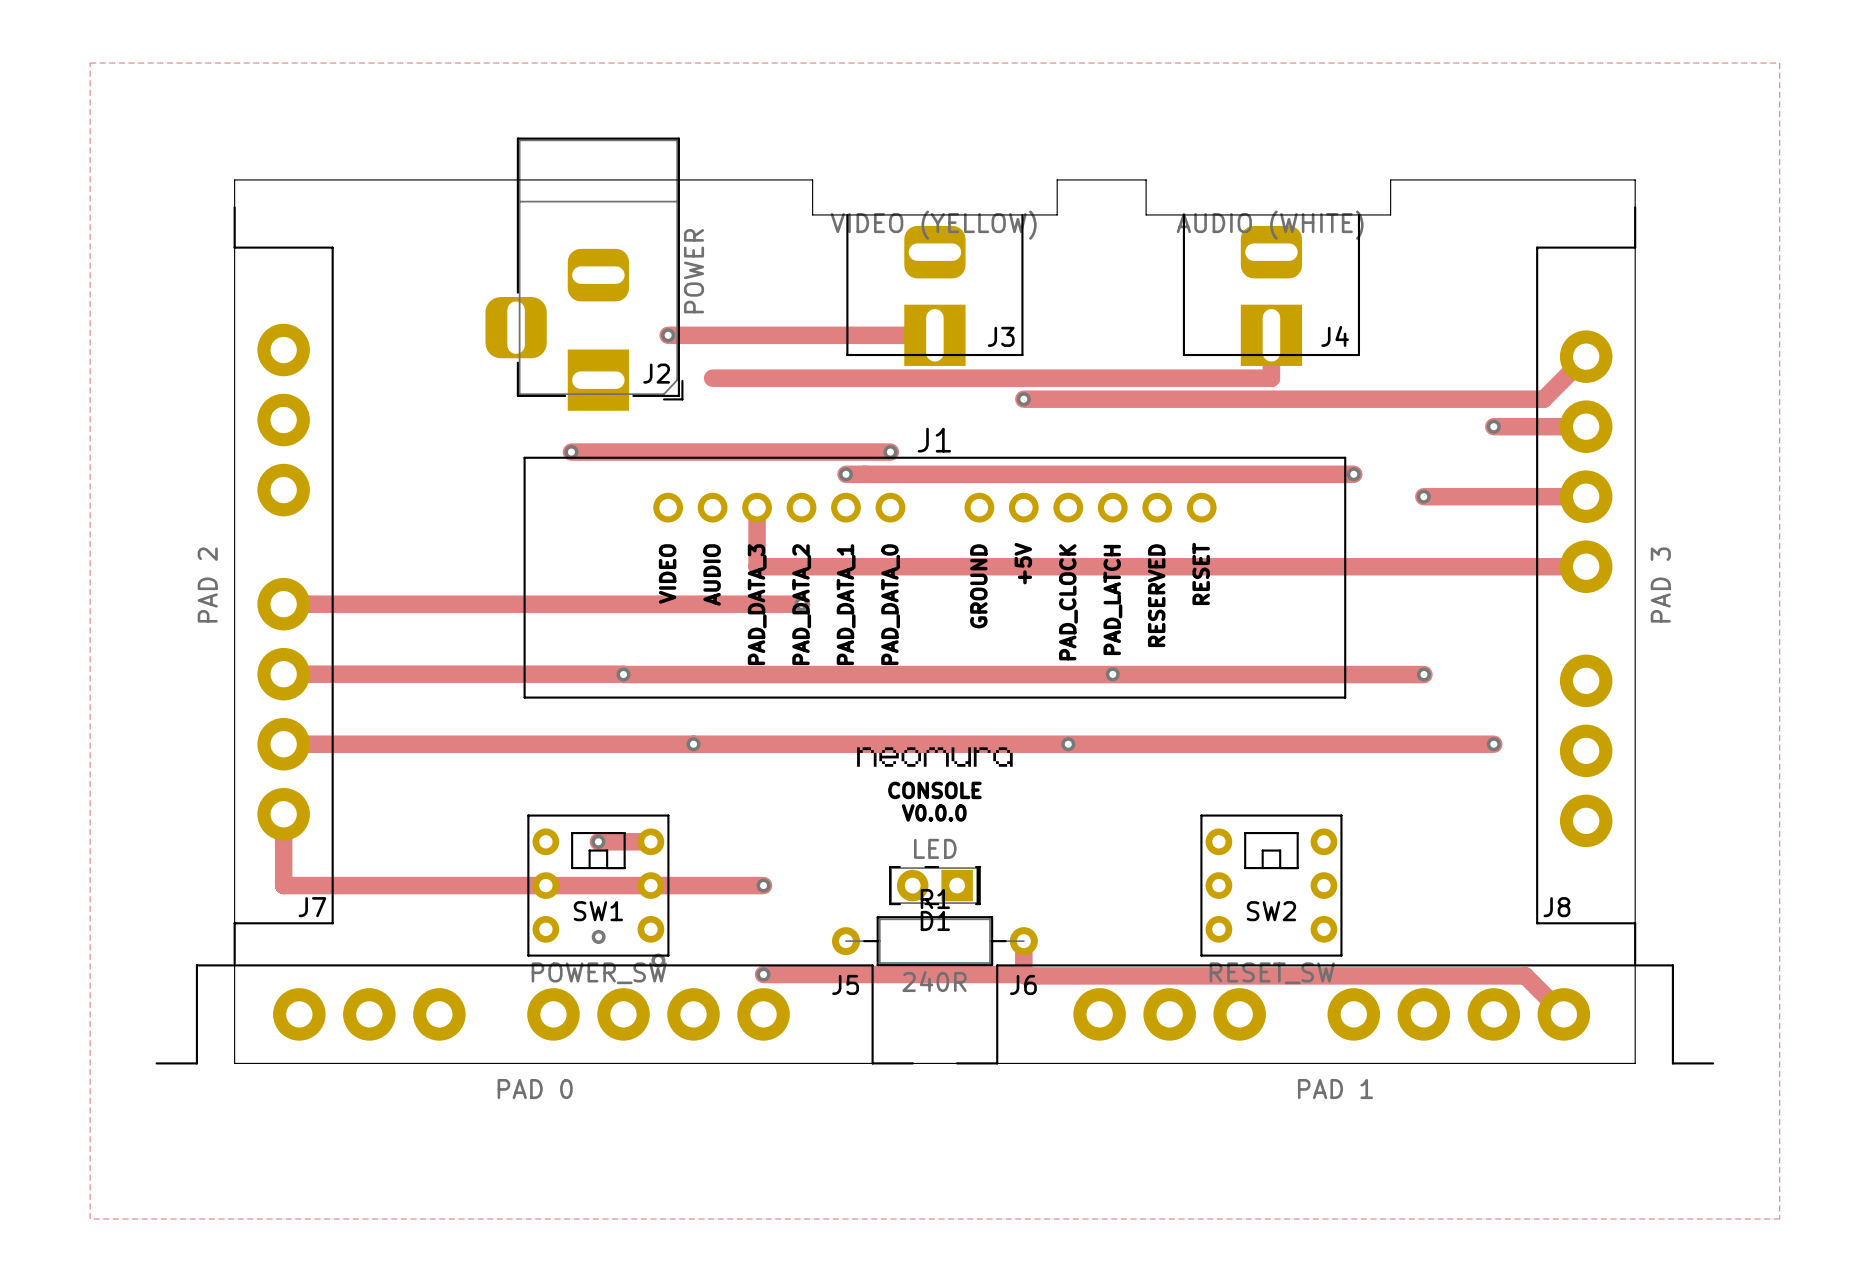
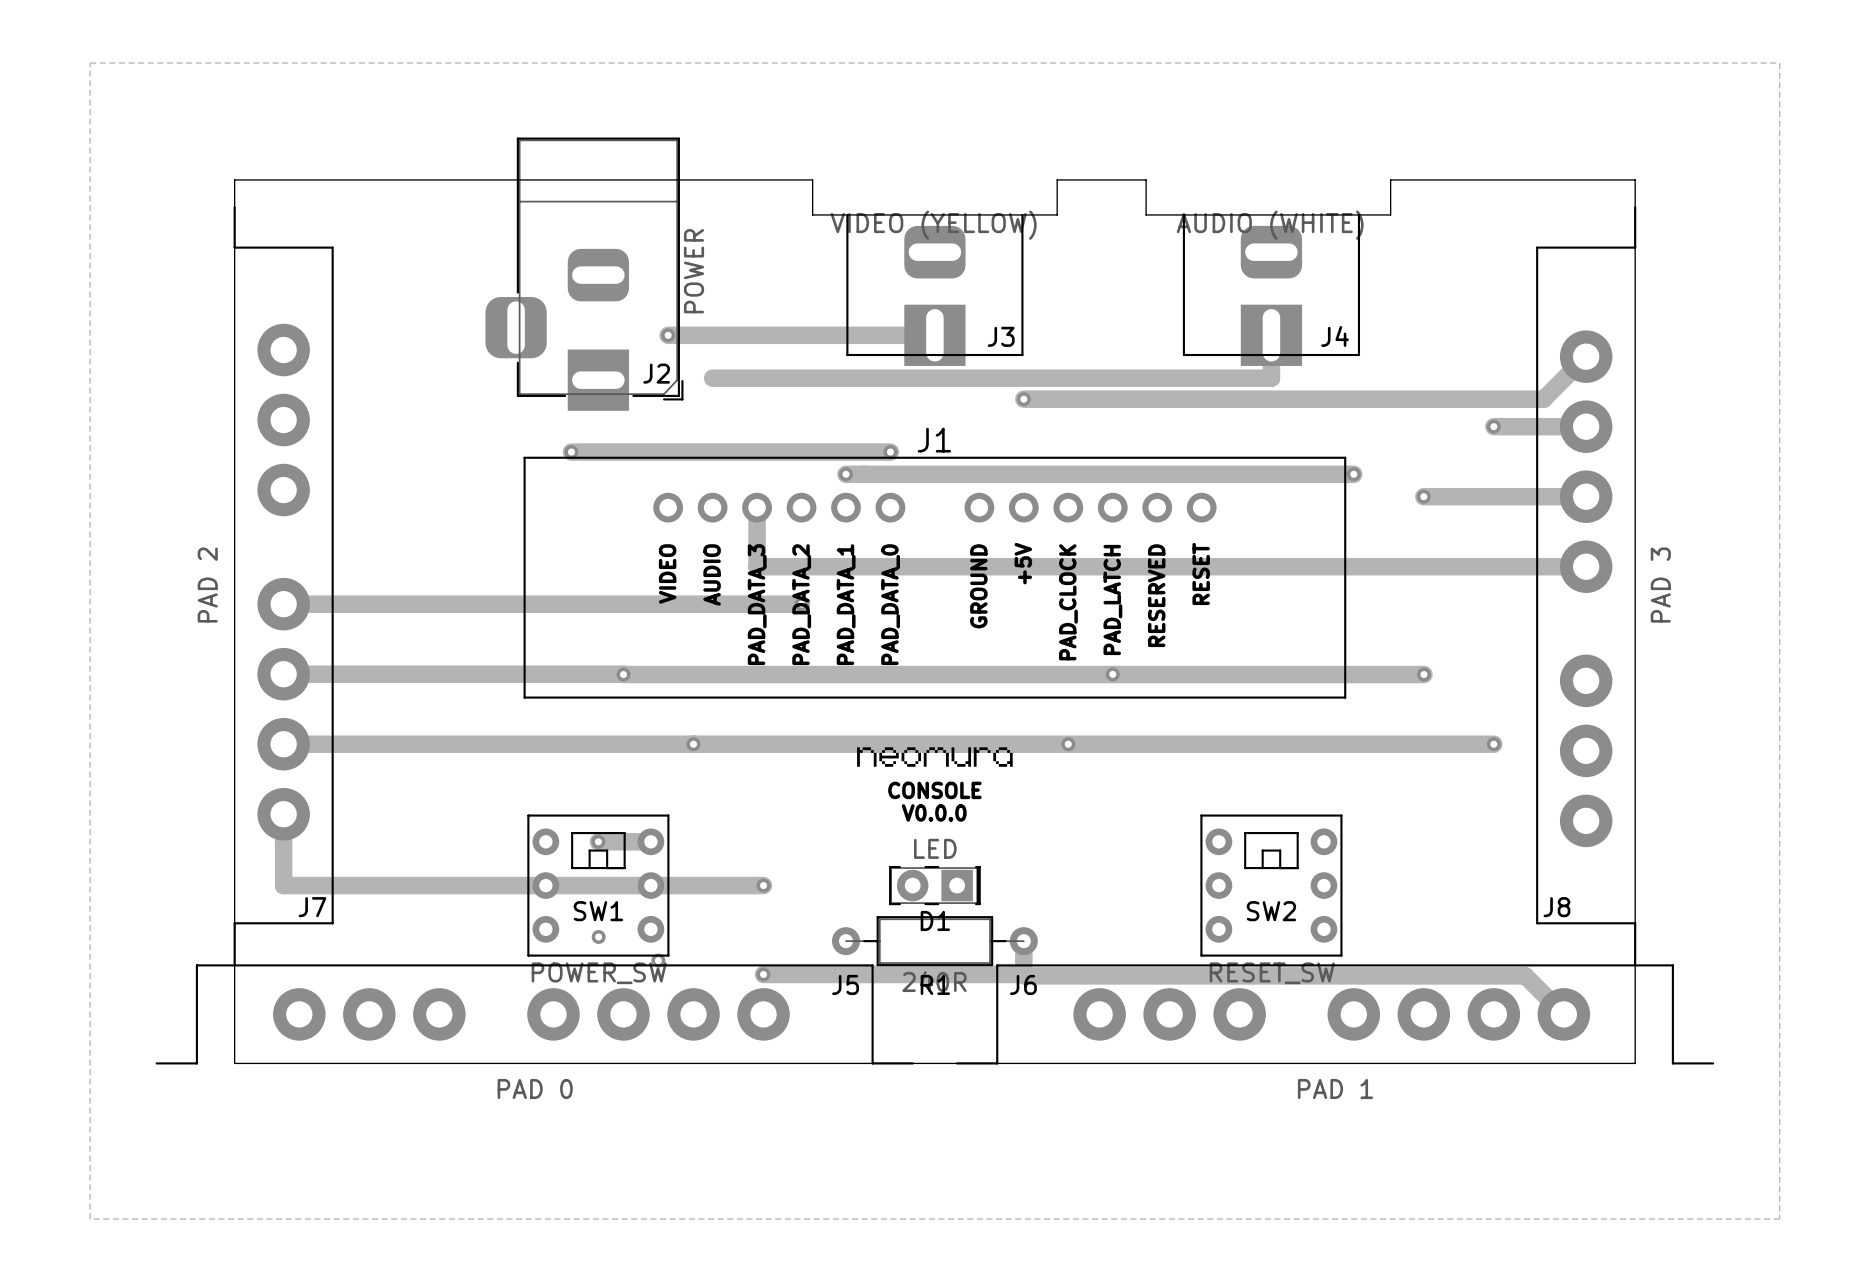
R1 name position: R1 (935, 899) -> R1 (935, 984)

